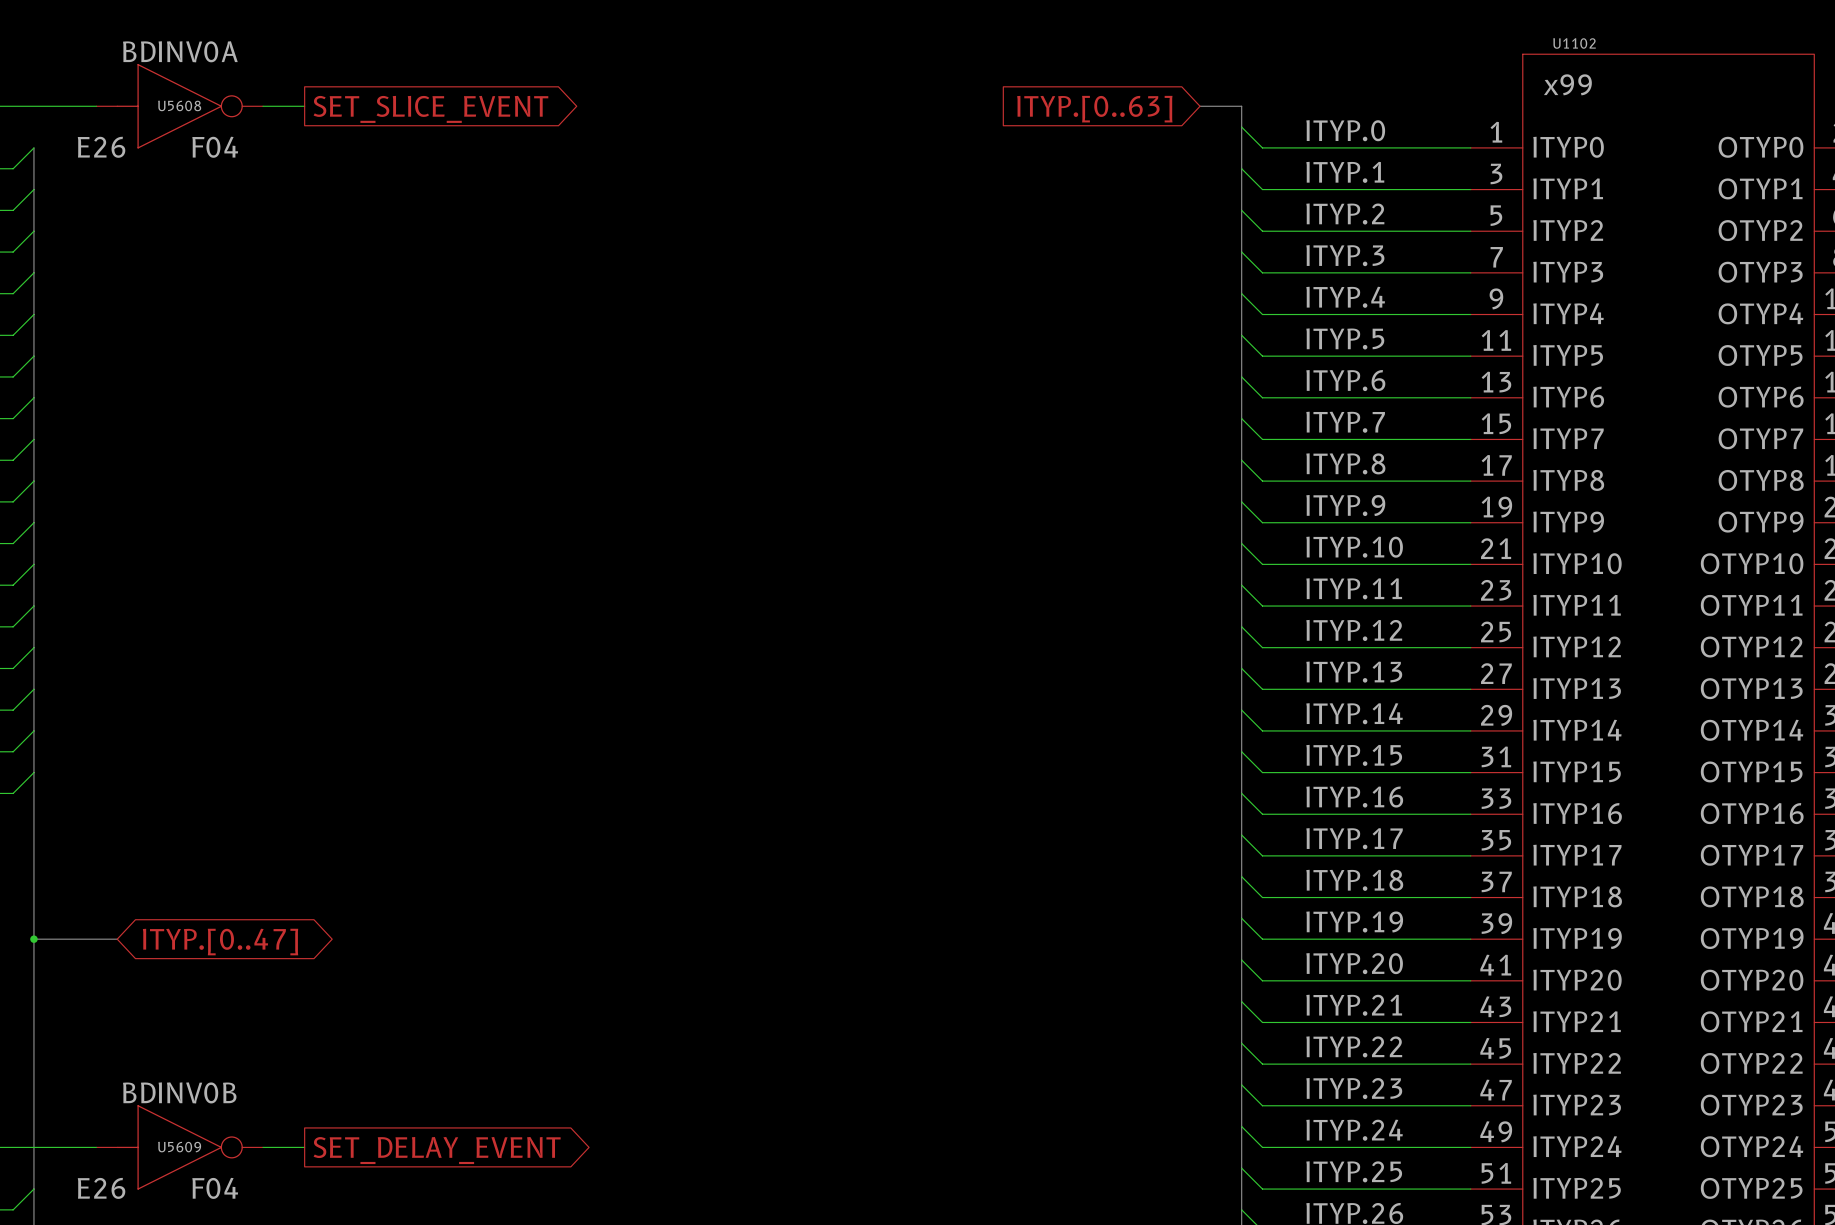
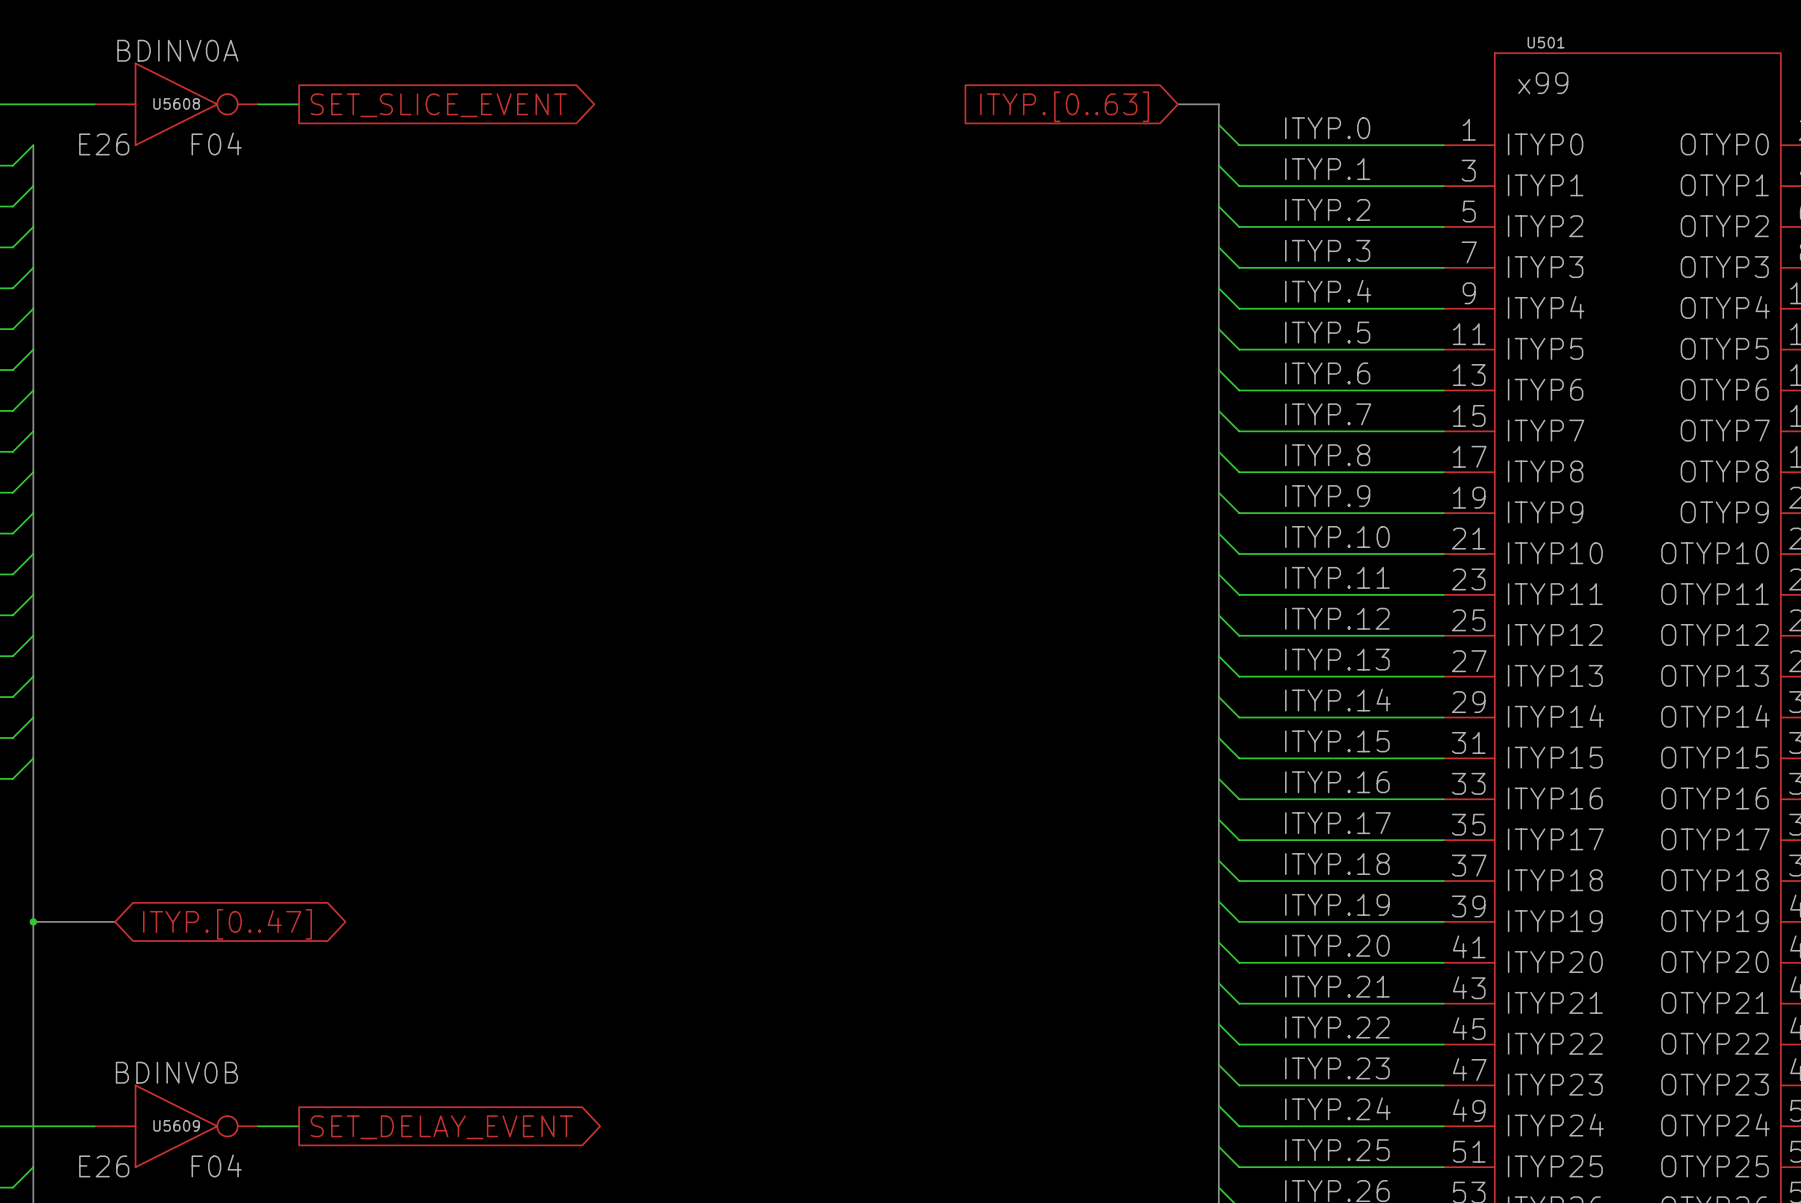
U1102 name: U1102 (1574, 43) -> U501 (1546, 42)

